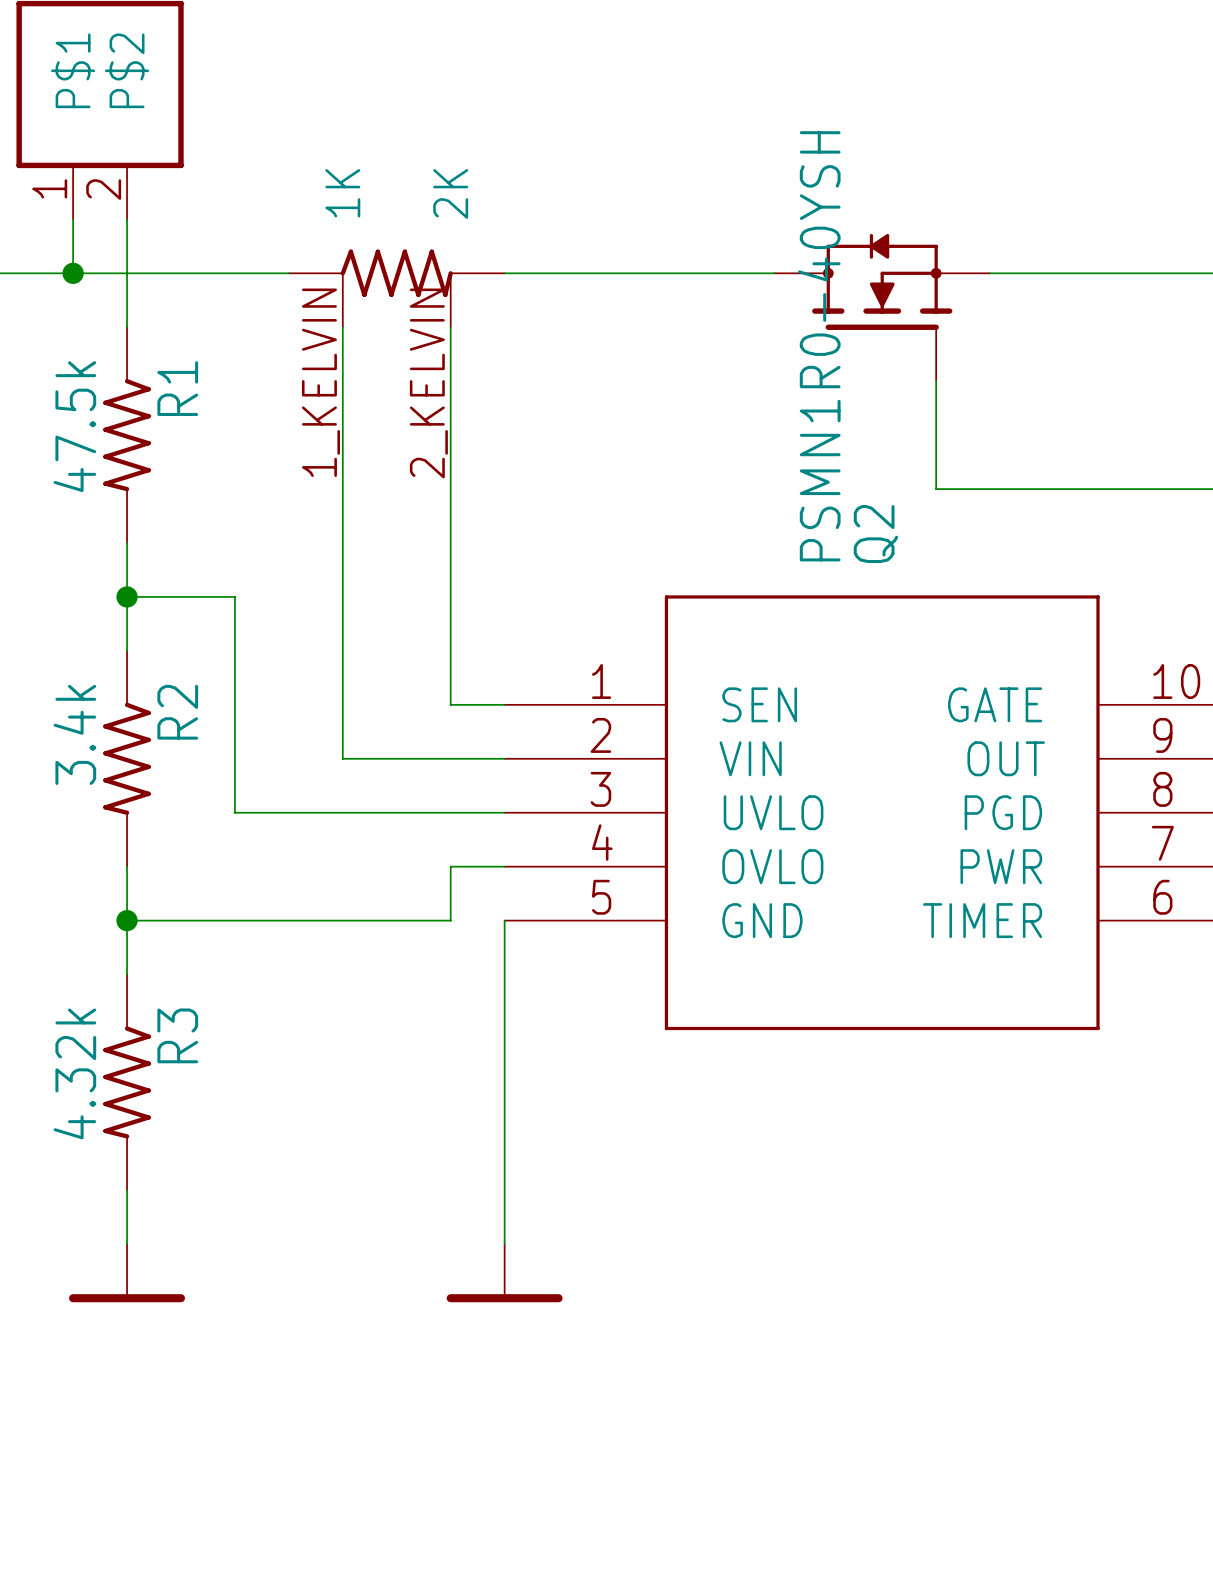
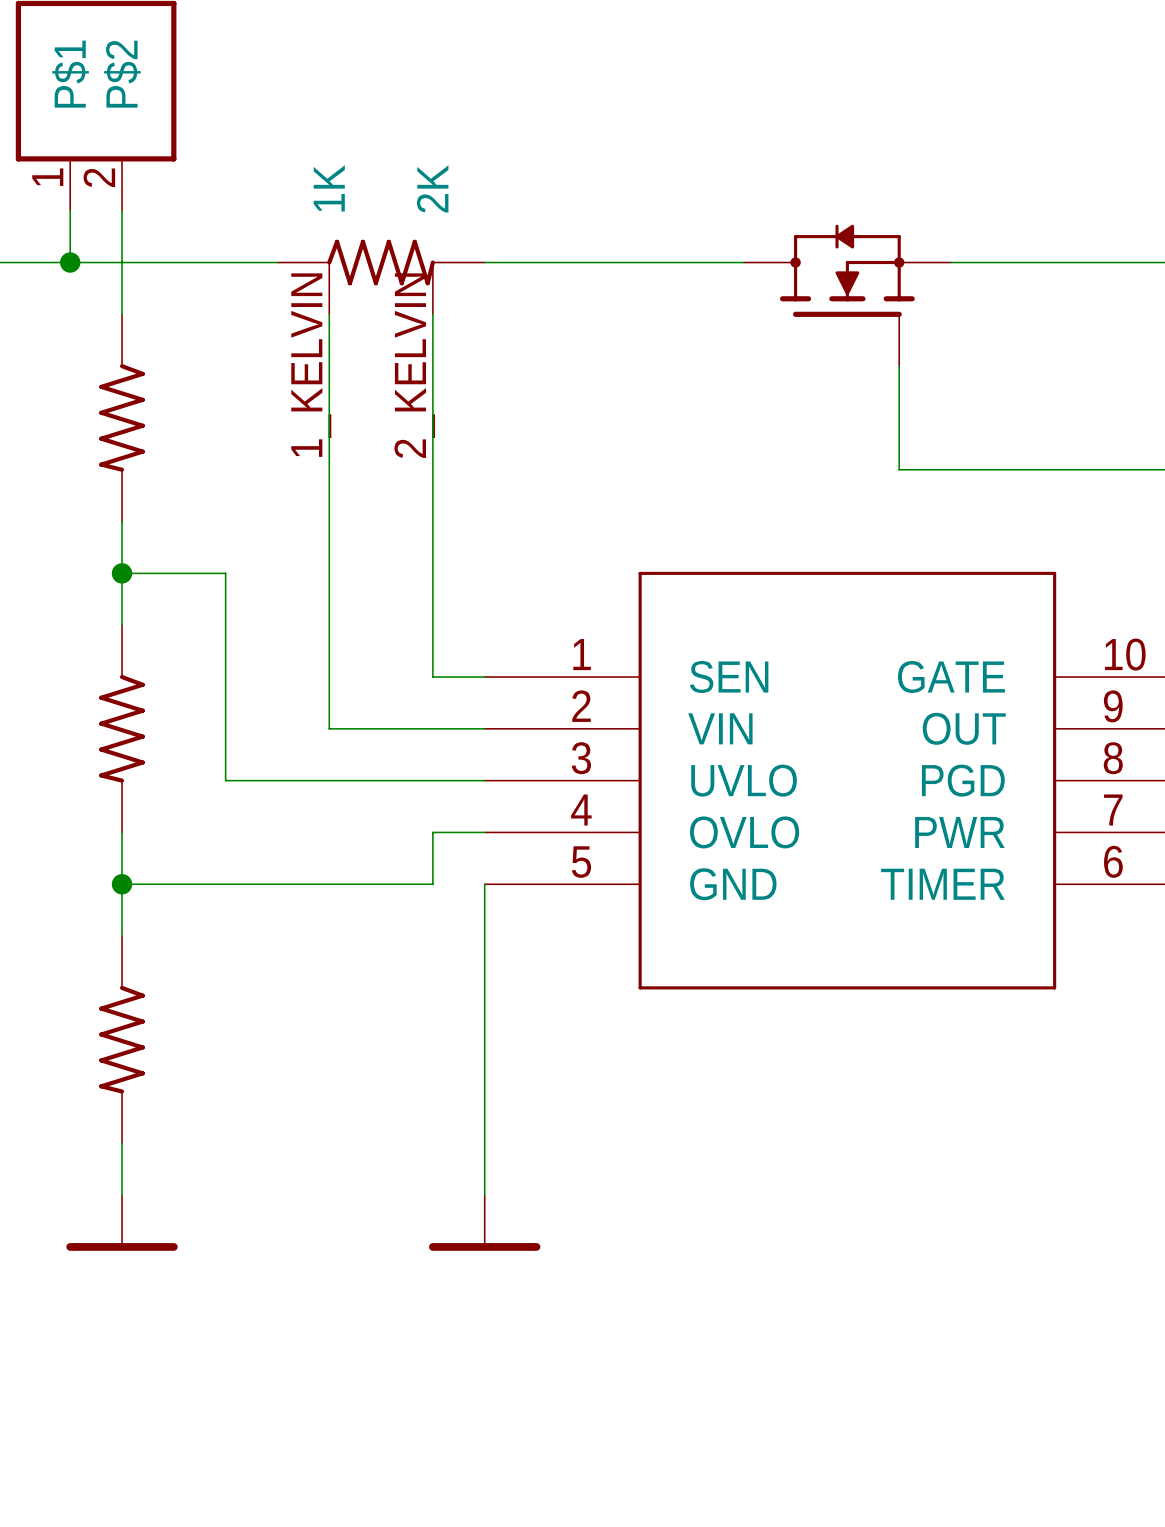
Q2 value: PSMN1R0-40YSH (819, 346) -> none
R1 name: R1 (177, 388) -> none
R1 value: 47.5k (74, 426) -> none
Q2 name: Q2 (875, 534) -> none
R2 name: R2 (177, 712) -> none
R2 value: 3.4k (74, 734) -> none
R3 name: R3 (177, 1035) -> none
R3 value: 4.32k (74, 1073) -> none

